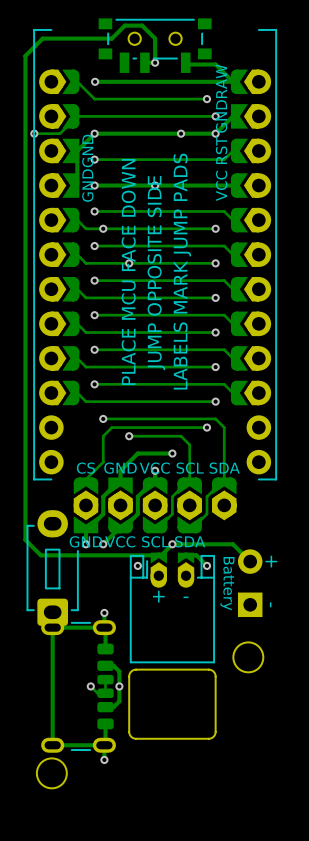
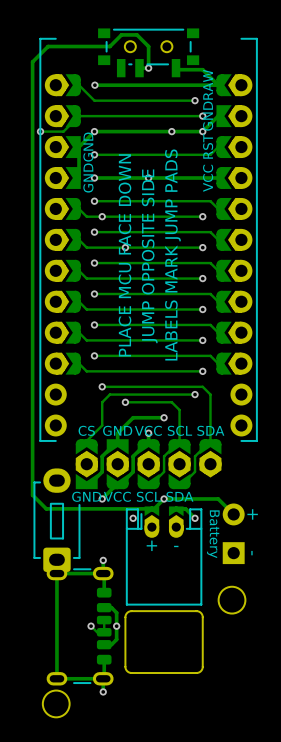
track: (85, 531) (85, 544) -> none
via: (85, 544) -> none

